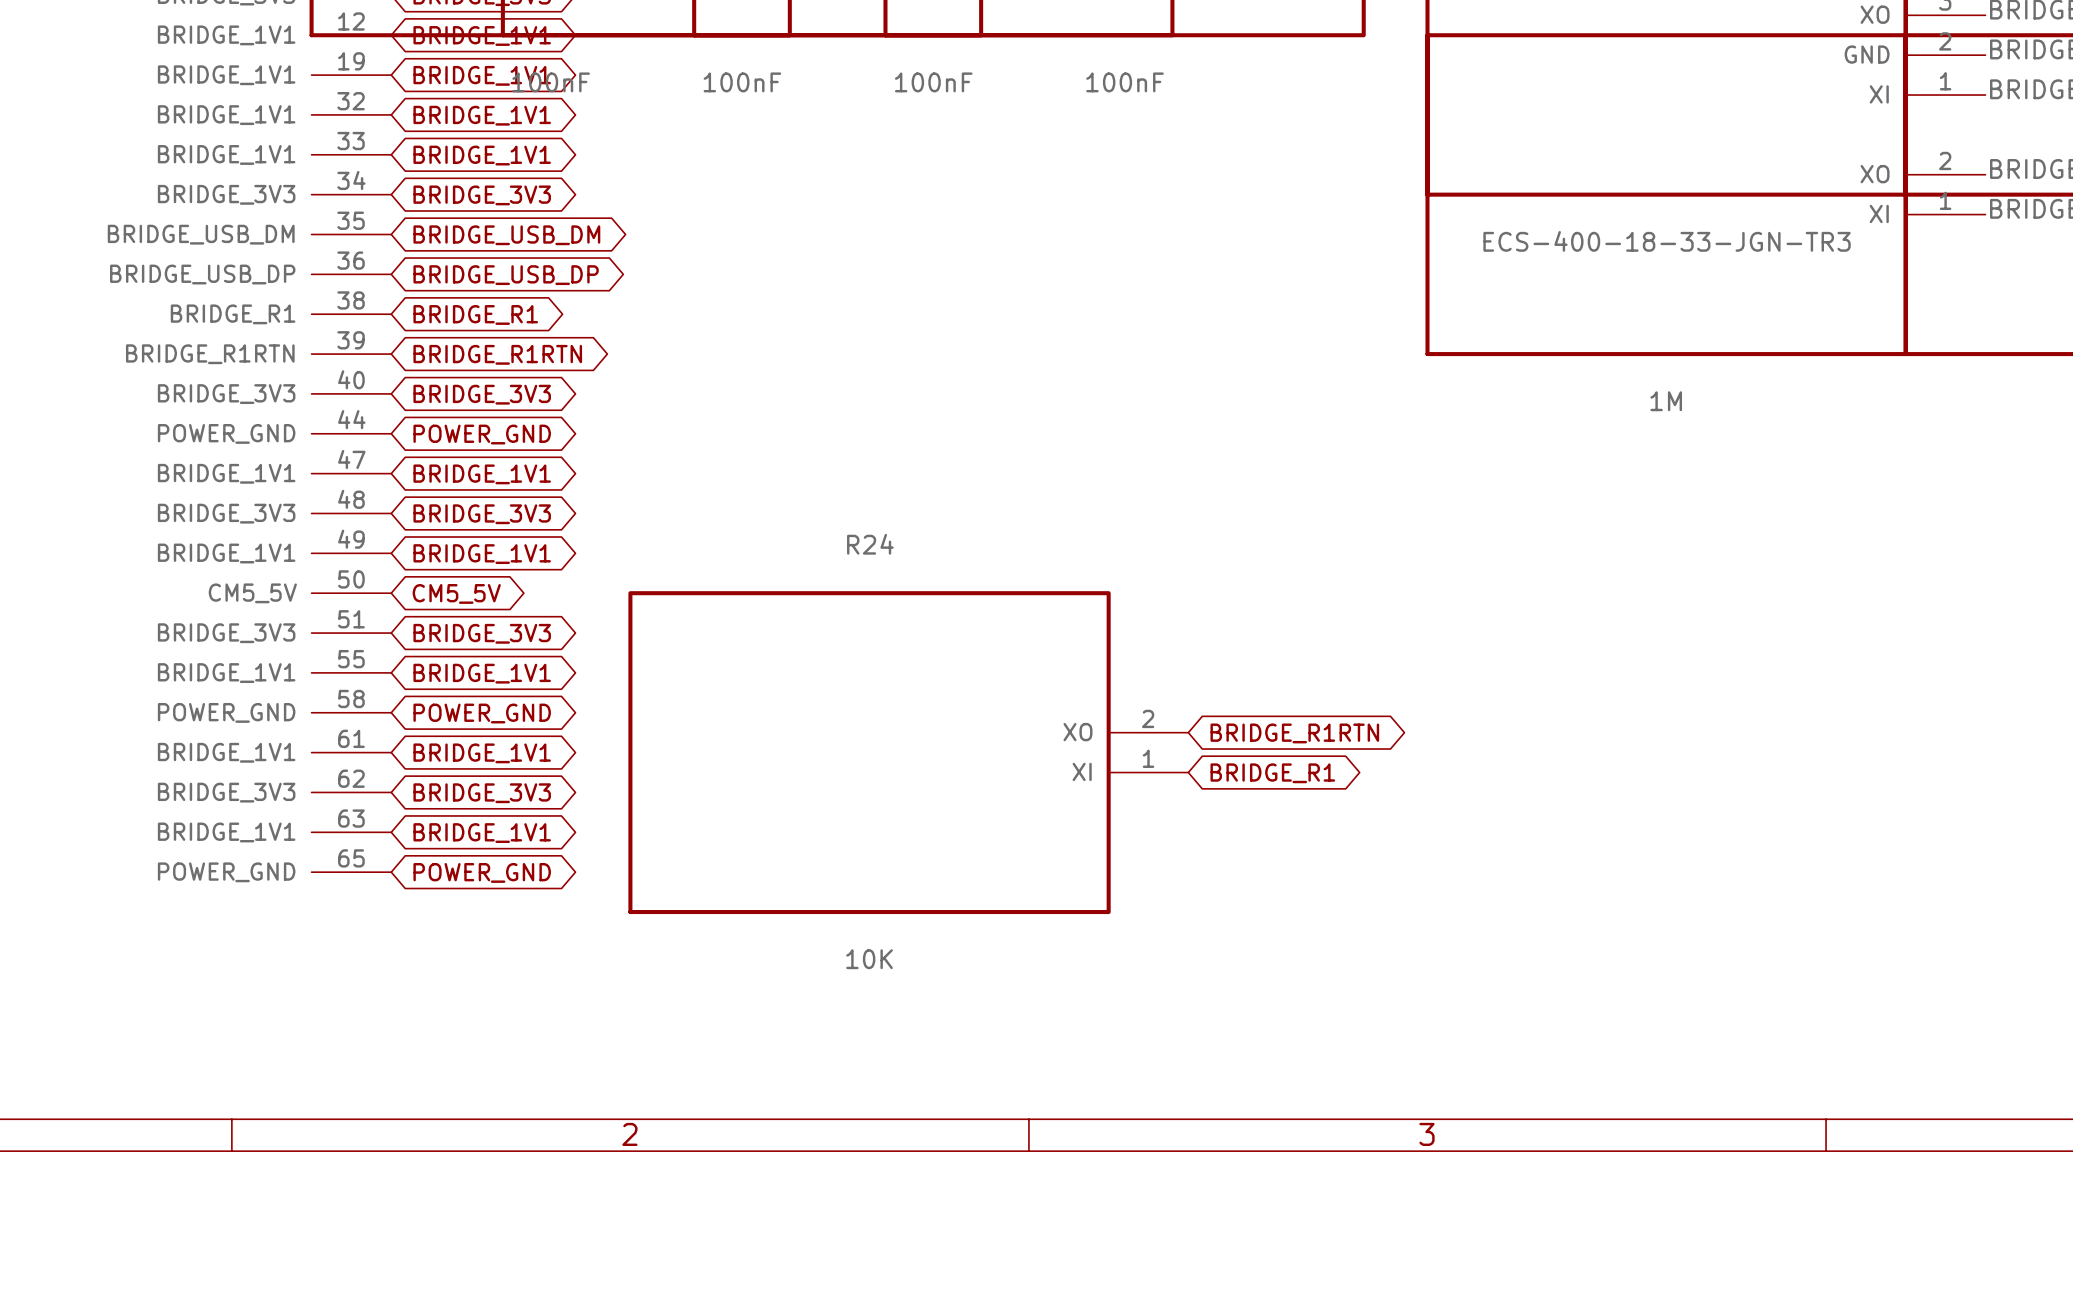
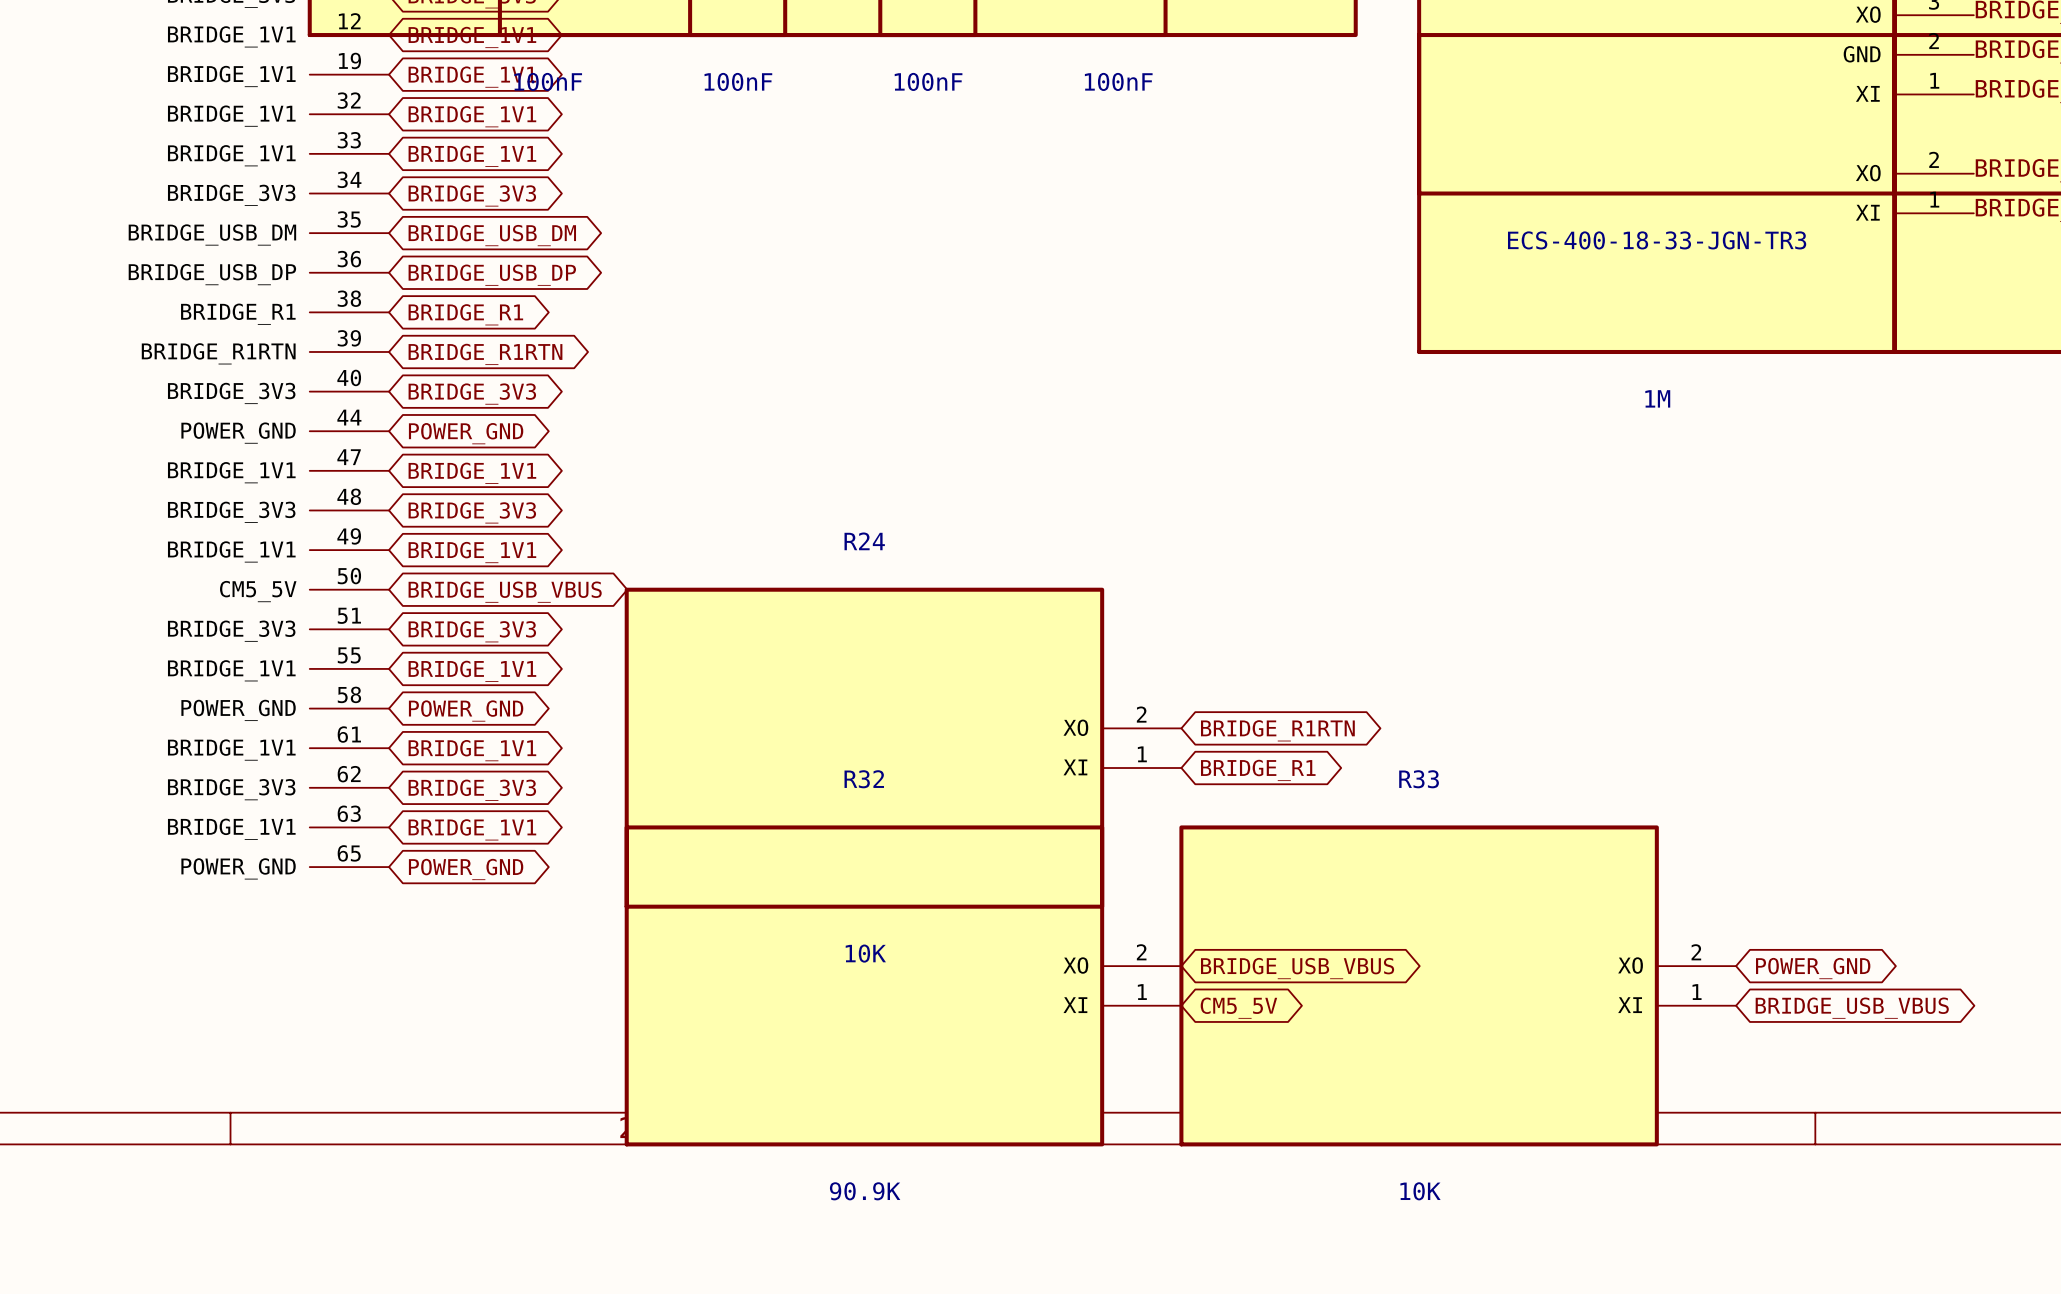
global label: CM5_5V (456, 593) -> BRIDGE_USB_VBUS (505, 592)
global label: none -> BRIDGE_USB_VBUS (1297, 968)
global label: none -> POWER_GND (1813, 968)
R32: none -> 90.9K (903, 985)
R33: none -> 10K (1457, 985)
global label: none -> CM5_5V (1238, 1008)
global label: none -> BRIDGE_USB_VBUS (1852, 1008)

